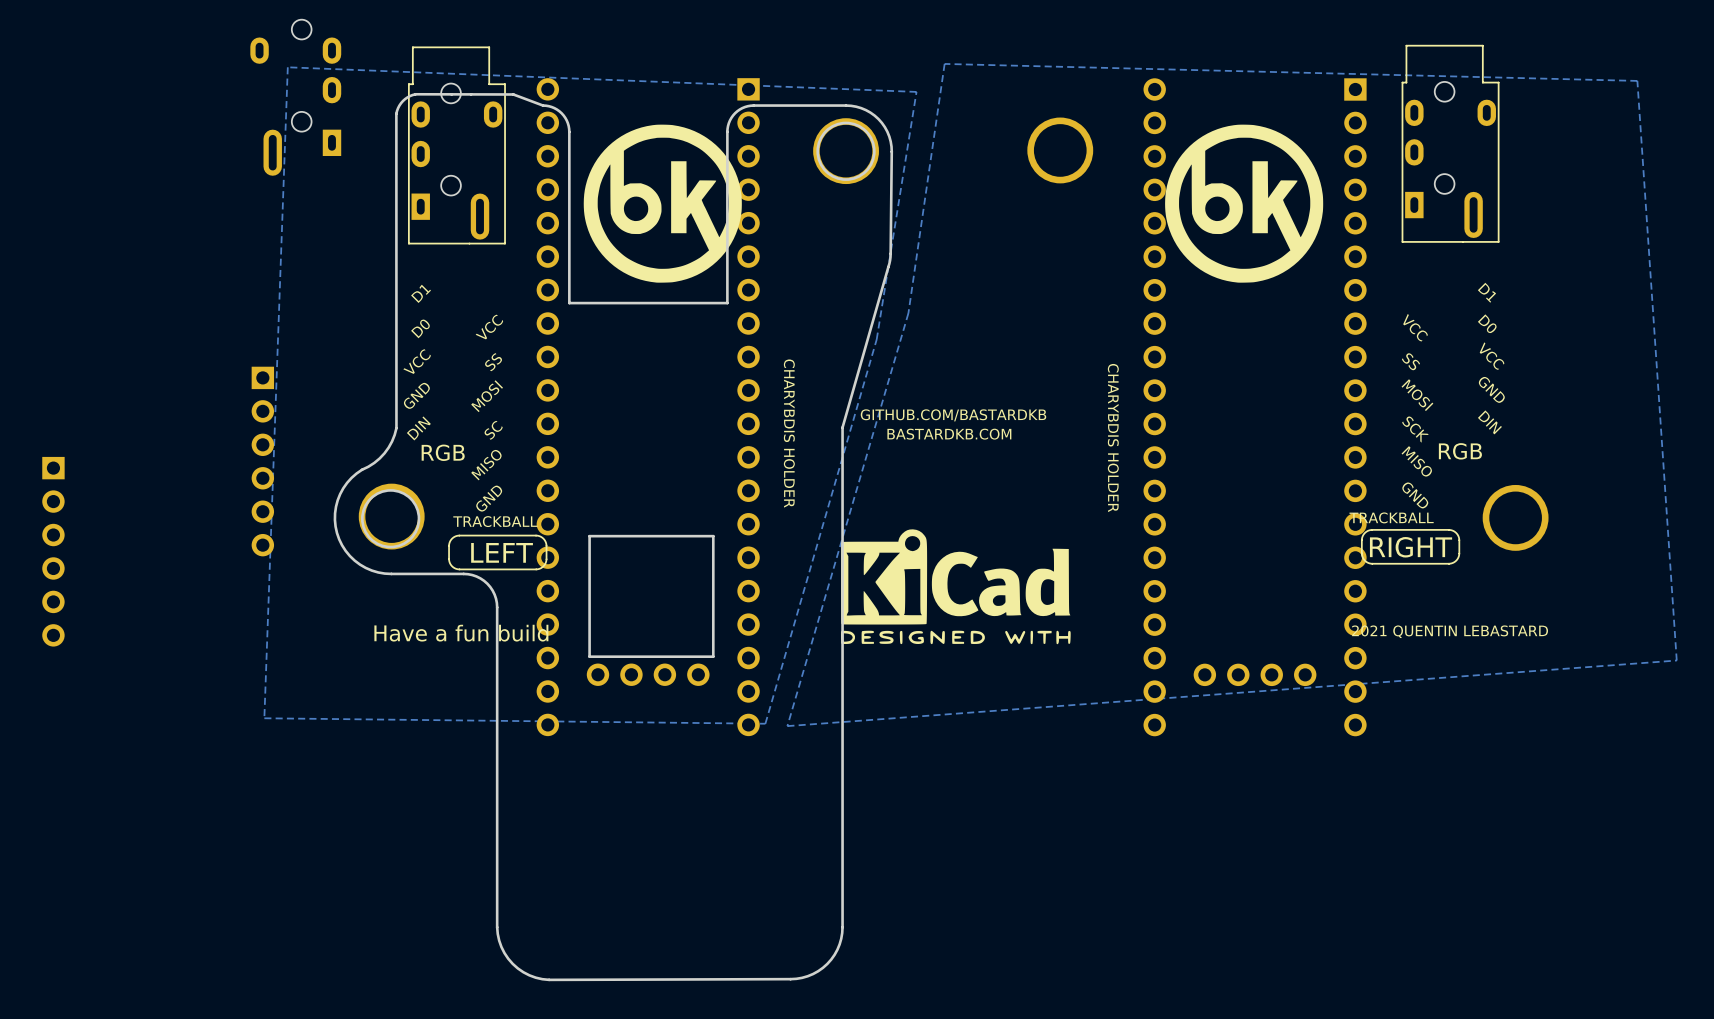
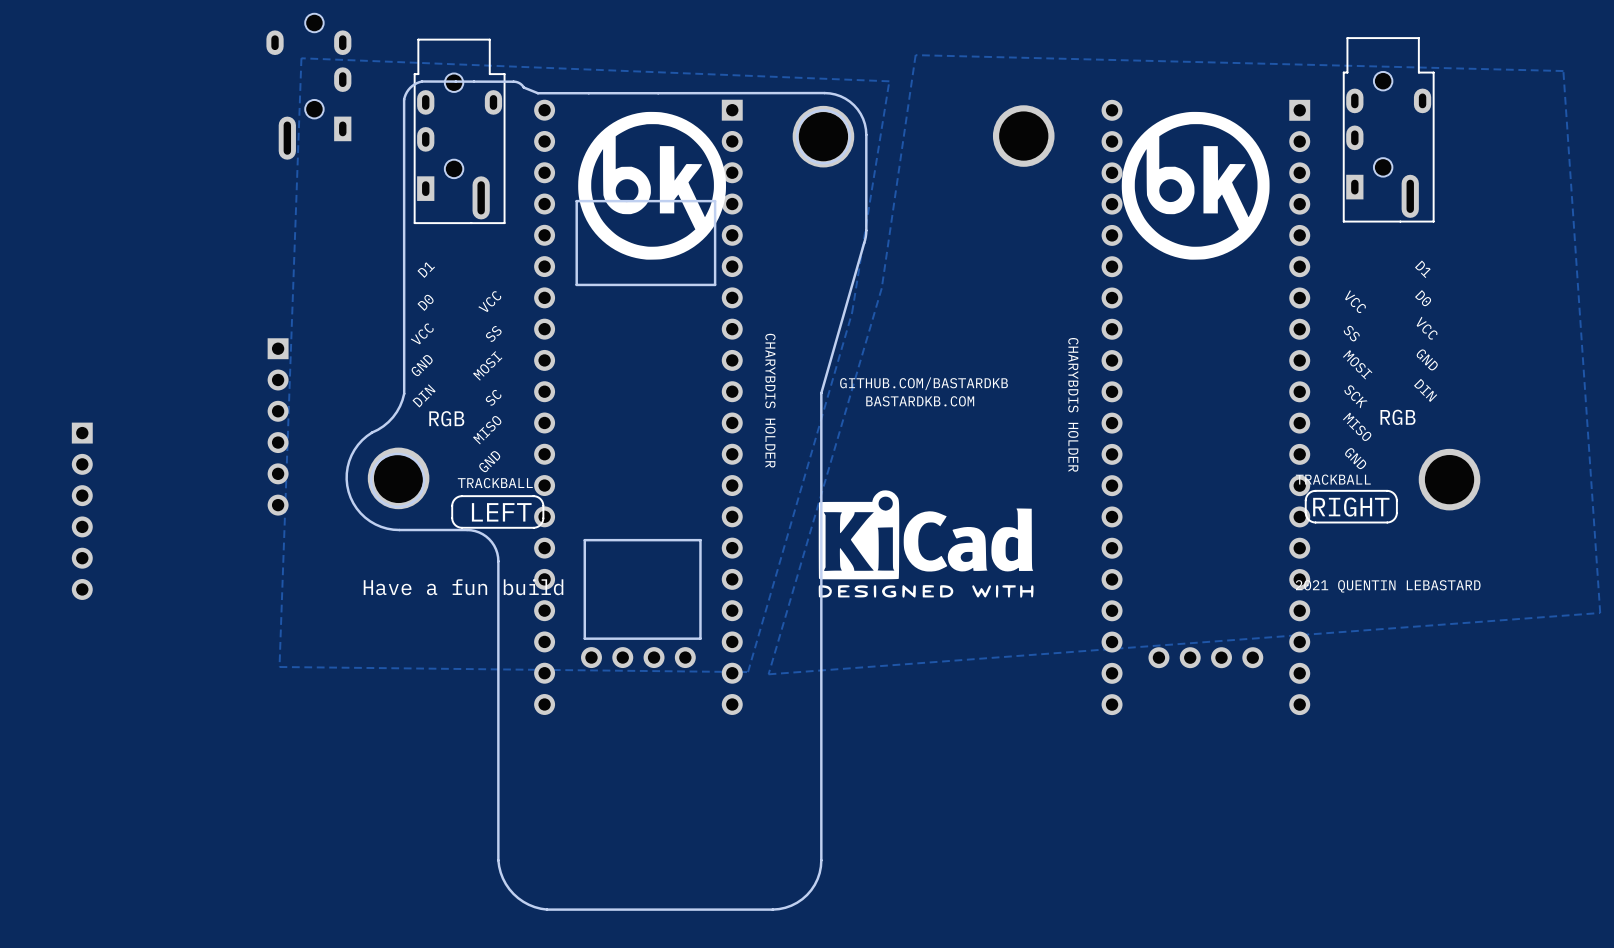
board edge: (415, 94) (513, 94) (554, 108) (563, 115) (569, 131) (569, 303) (727, 303) (727, 128) (731, 117) (742, 108) (753, 105) (851, 105) (861, 108) (874, 115) (887, 131) (891, 151) (890, 260) (842, 427) (842, 933) (834, 954) (822, 967) (813, 974) (790, 979) (549, 979) (535, 977) (523, 972) (512, 963) (501, 947) (497, 927) (497, 607) (494, 594) (484, 580) (468, 574) (391, 573) (371, 570) (360, 564) (349, 556) (339, 539) (335, 526) (336, 506) (343, 488) (356, 473) (374, 462) (384, 453) (392, 441) (396, 428) (396, 113) (402, 101) (415, 94) -> (421, 81) (514, 81) (537, 93) (830, 93) (849, 101) (863, 118) (866, 134) (865, 236) (821, 393) (820, 866) (817, 879) (811, 890) (802, 899) (791, 905) (772, 909) (546, 909) (523, 901) (513, 893) (502, 878) (498, 860) (498, 561) (495, 549) (486, 536) (471, 530) (399, 530) (381, 526) (370, 521) (356, 508) (347, 485) (347, 467) (354, 449) (366, 436) (383, 426) (393, 417) (400, 406) (404, 393) (404, 99) (410, 87) (421, 81)
board edge: none -> (715, 201) (576, 201) (576, 284) (715, 284) (715, 201)
part position: (648, 407) -> (638, 407)
part position: (1255, 407) -> (1205, 407)
board edge: (713, 536) (713, 656) (589, 656) (589, 536) (713, 536) -> none
board edge: none -> (700, 540) (584, 540) (584, 638) (700, 638) (700, 540)

